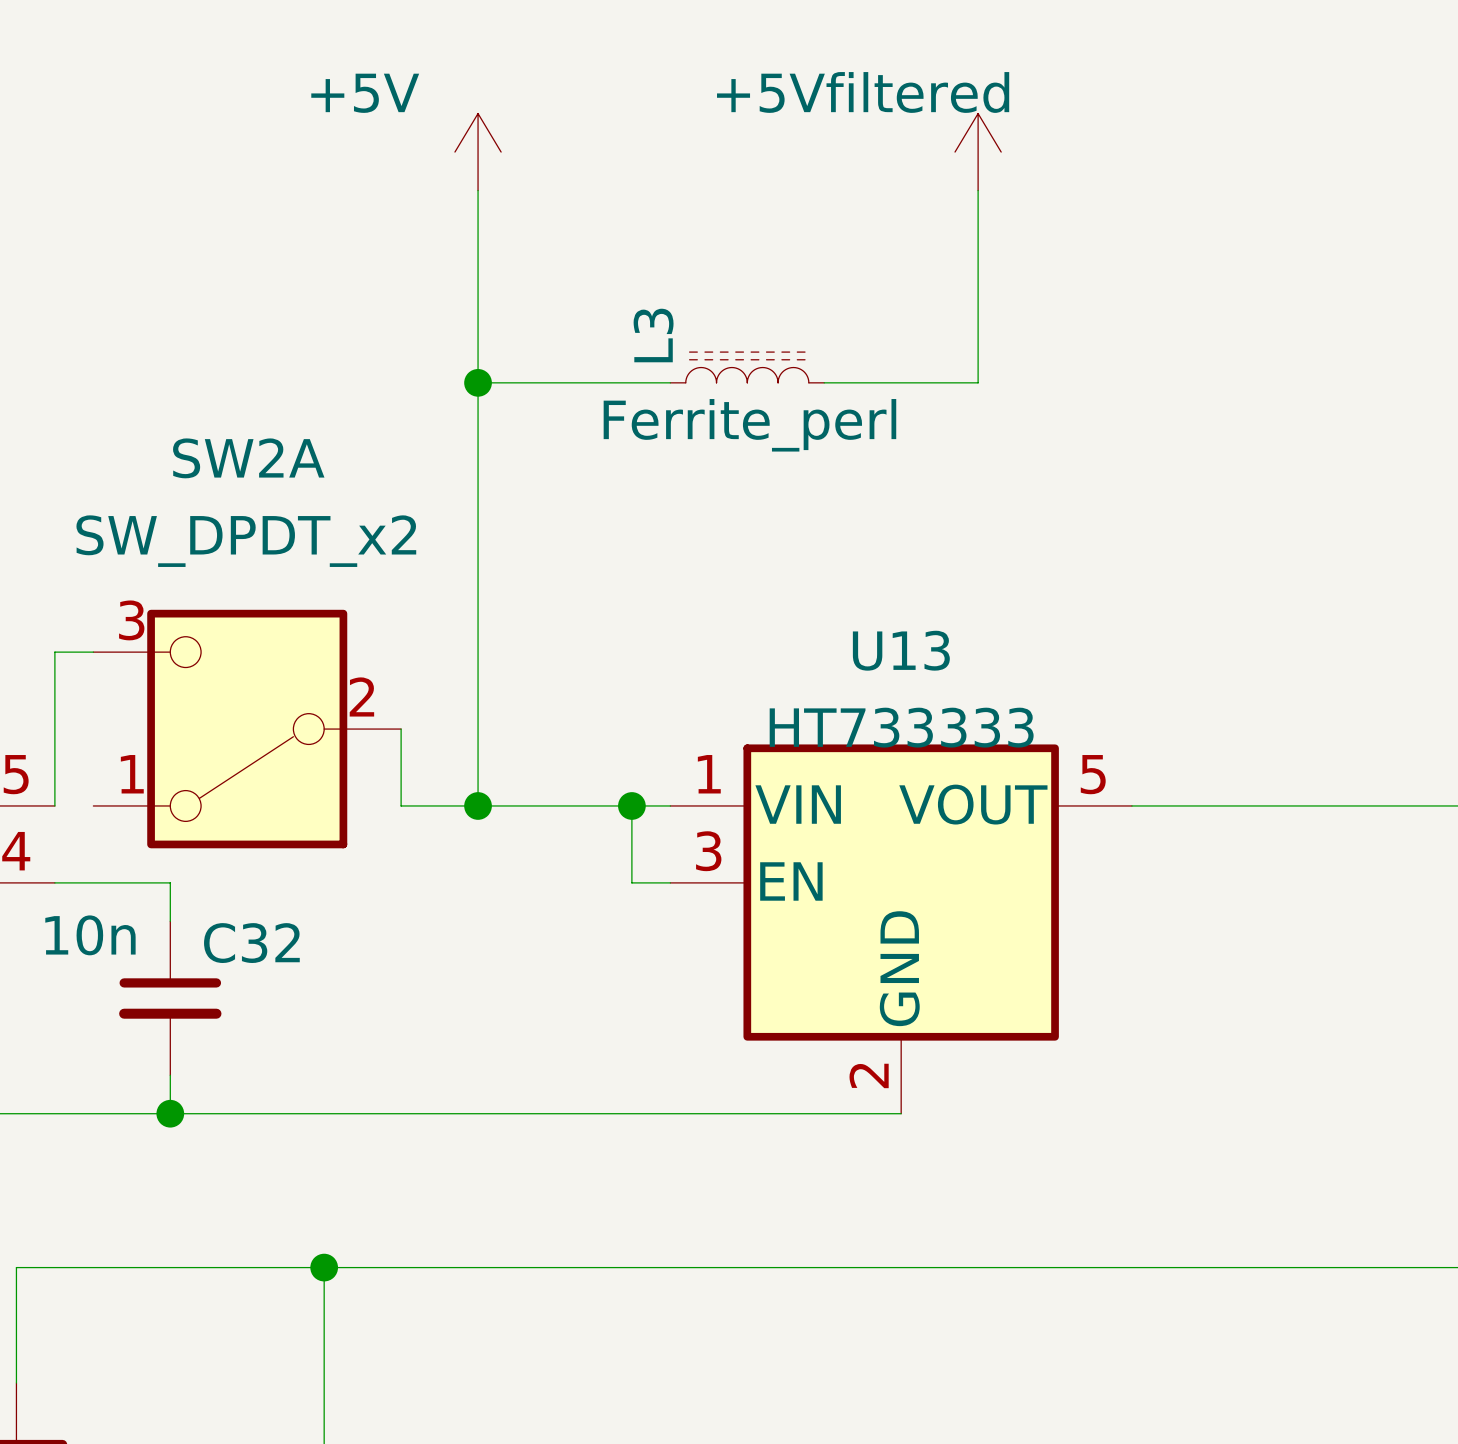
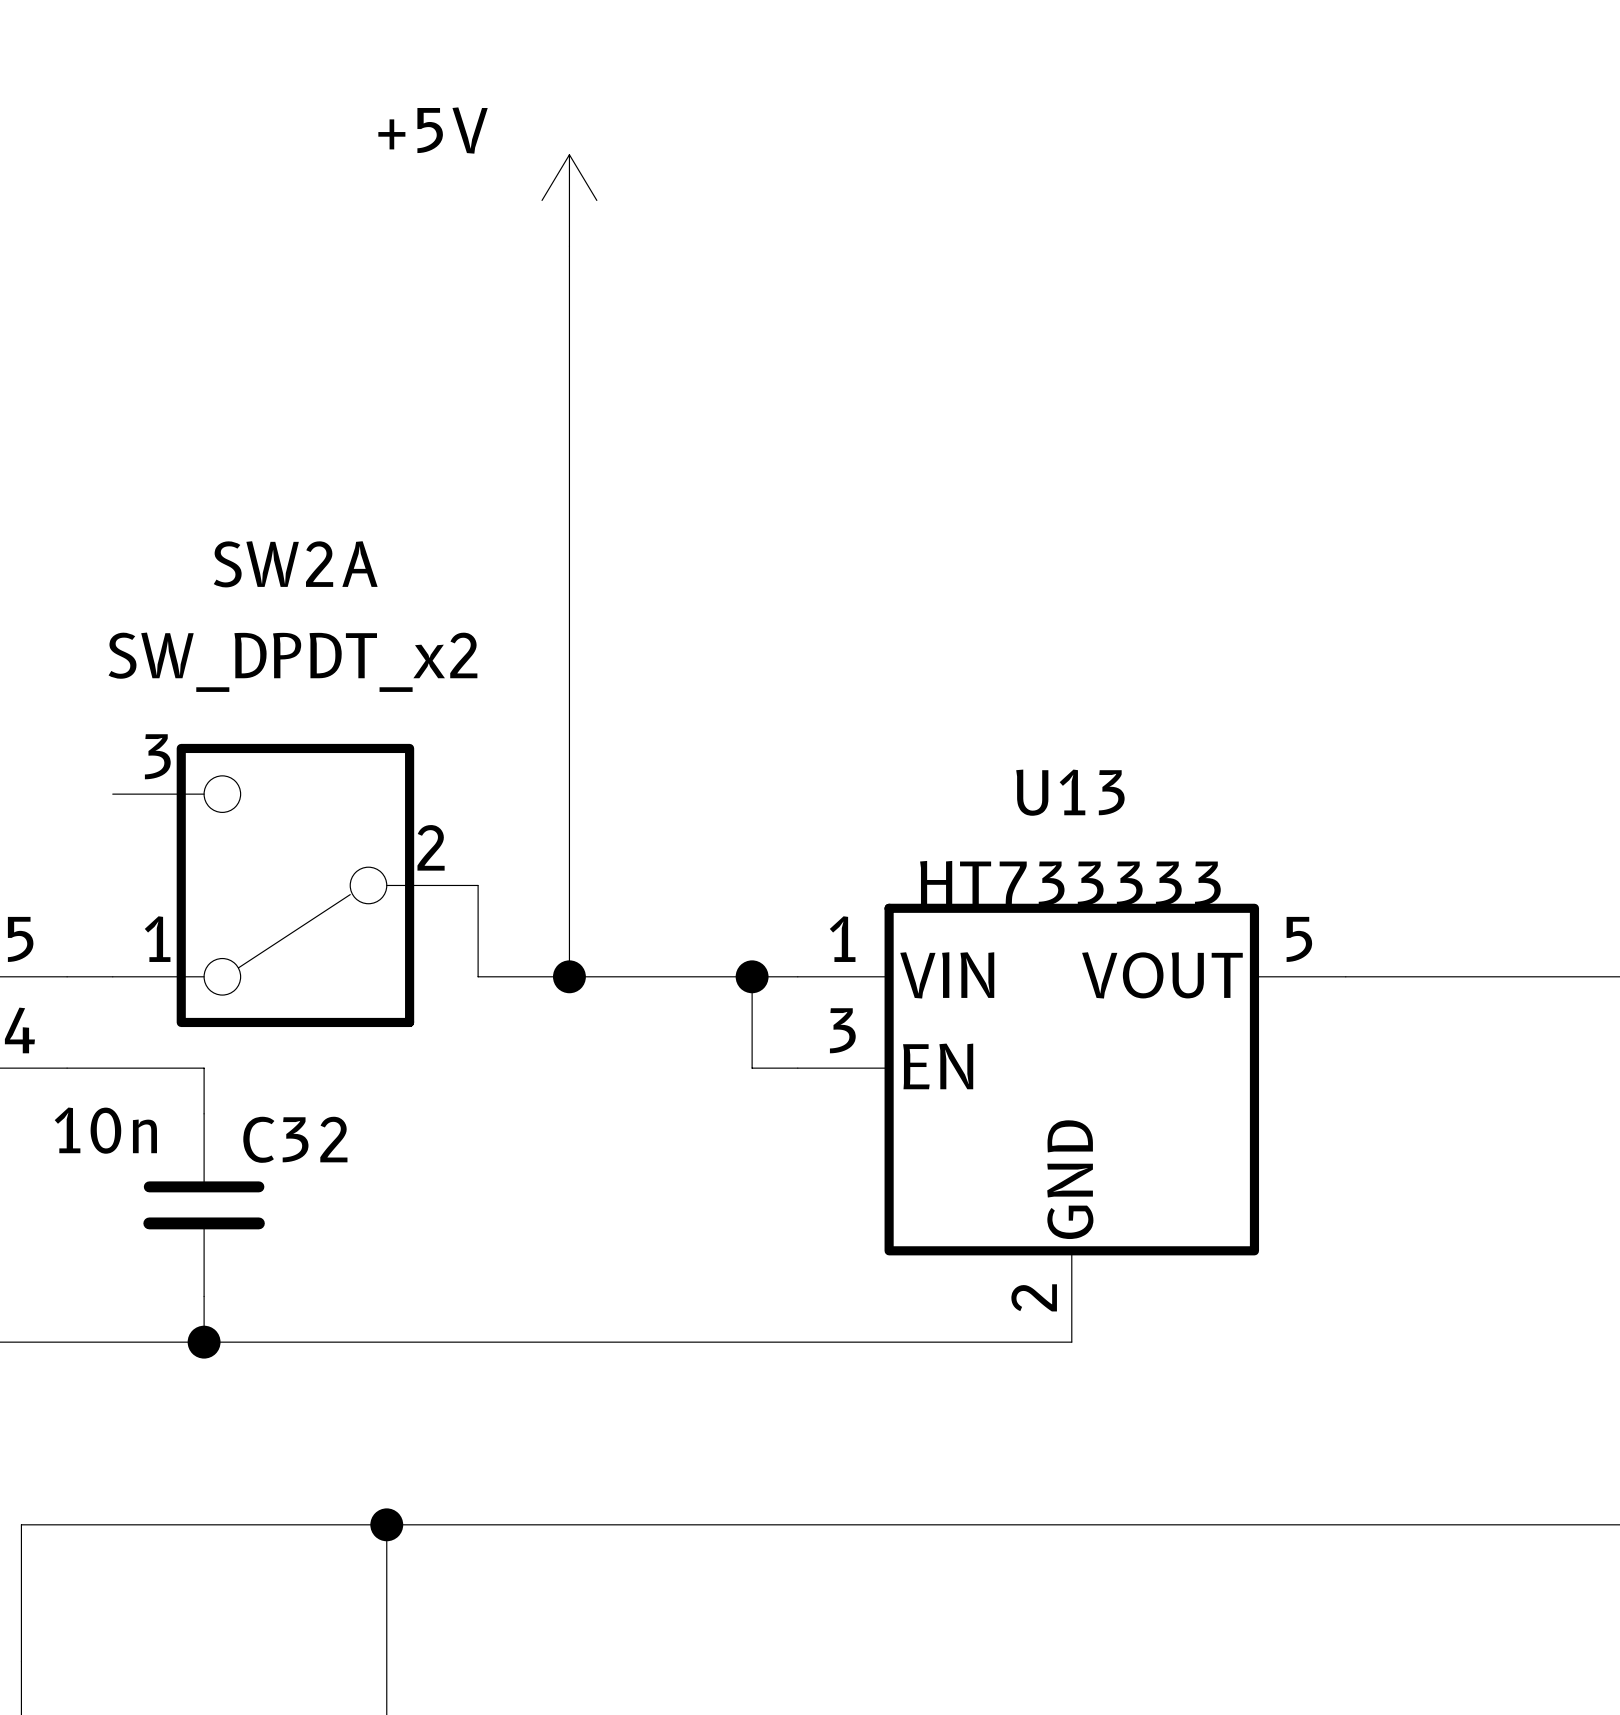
power symbol: +5Vfiltered (978, 152) -> none
wire: (978, 190) (978, 382) (824, 382) -> none
L3: Ferrite_perl (747, 367) -> none
wire: (478, 382) (670, 382) -> none
junction: (478, 382) -> none
wire: (93, 652) (54, 652) (54, 805) -> (112, 976) (67, 976)

